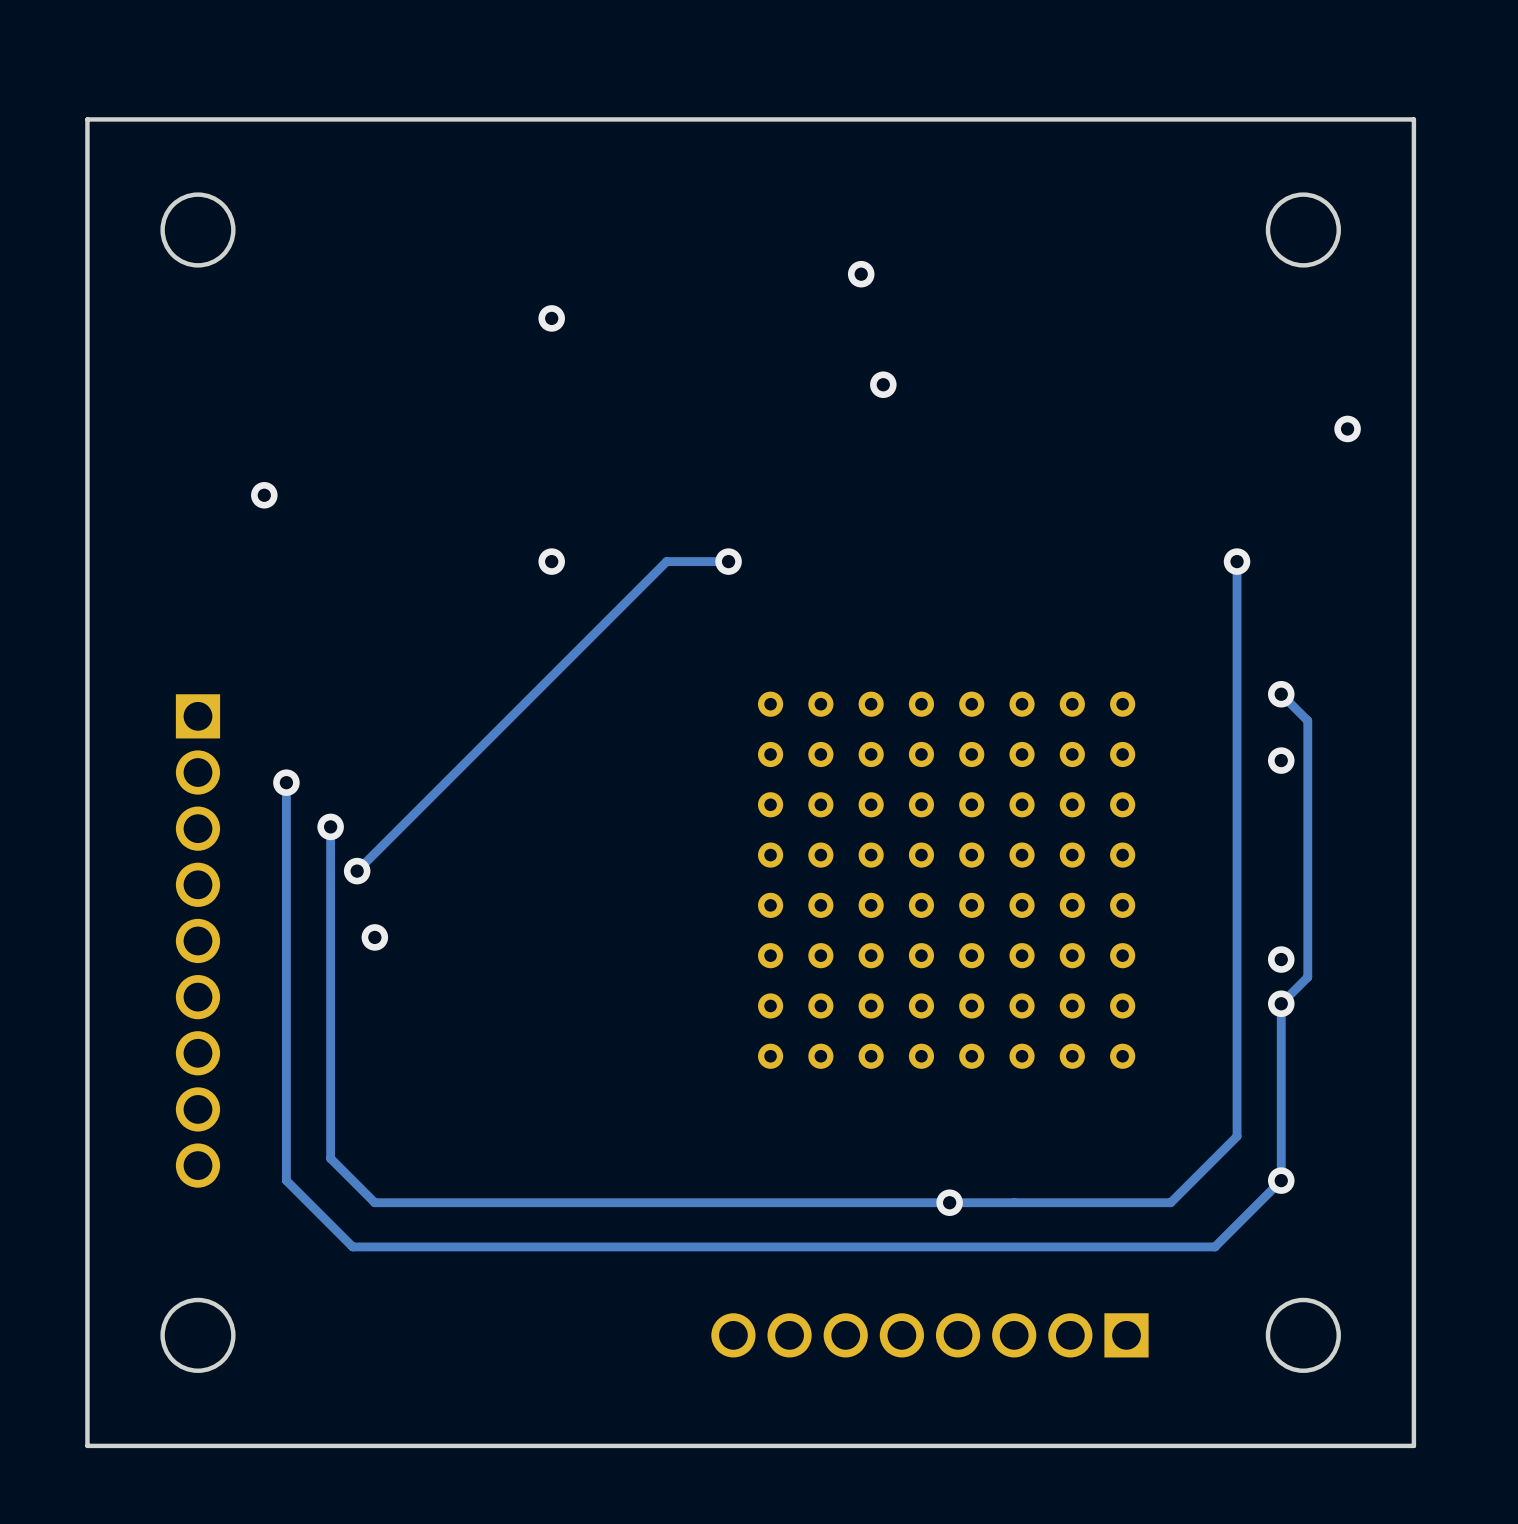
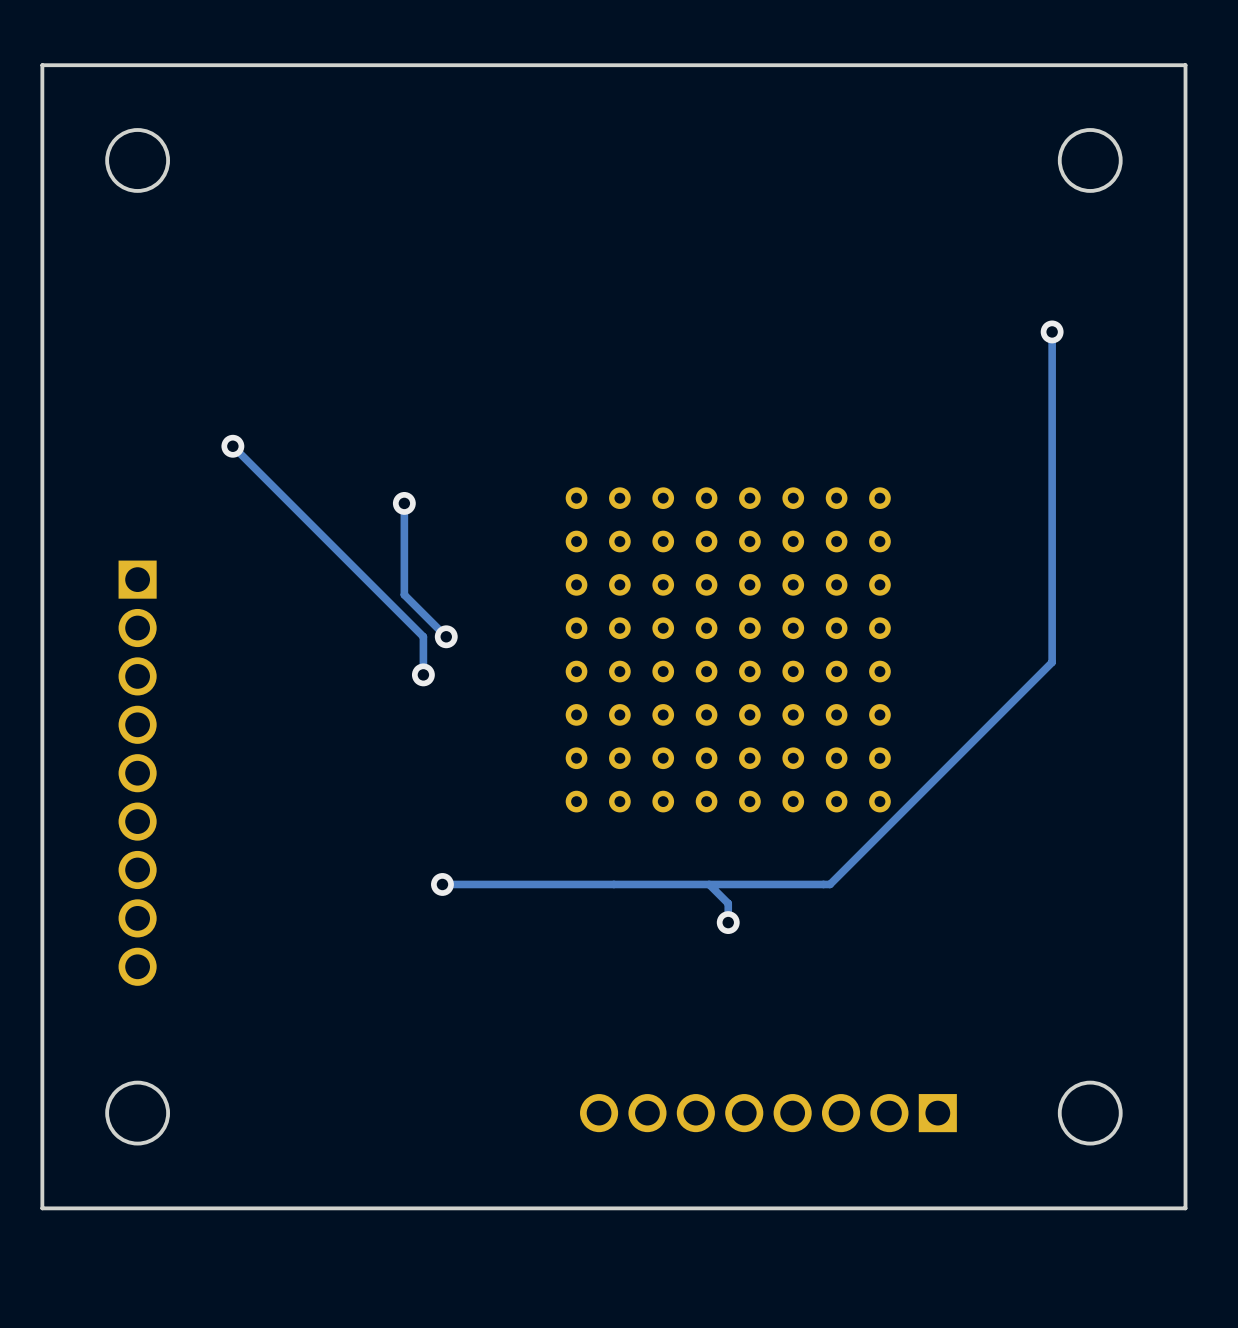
via: (861, 274) -> none
via: (551, 318) -> none
via: (883, 384) -> none
track: none -> (1052, 331) (1052, 662) (830, 884) (442, 884)
via: none -> (1052, 331)
via: (1347, 428) -> none
via position: (264, 495) -> (232, 446)
track: none -> (232, 446) (423, 636) (423, 674)
via position: (551, 561) -> (404, 503)
track: (728, 561) (666, 561) (357, 871) -> none
via: (728, 561) -> none
track: (1237, 561) (1237, 1136) (1170, 1202) (374, 1202) (330, 1158) (330, 826) -> none
via: (1237, 561) -> none
track: none -> (404, 503) (404, 594) (446, 636)
track: (1281, 694) (1307, 720) (1307, 977) (1281, 1003) (1281, 1180) (1214, 1246) (352, 1246) (286, 1180) (286, 782) -> none
via: (1281, 694) -> none
via: (1281, 760) -> none
via: (286, 782) -> none
via: none -> (446, 636)
via: (330, 826) -> none
via: none -> (423, 674)
via: (357, 871) -> none
part position: (946, 880) -> (728, 649)
via: (374, 937) -> none
via: (1281, 959) -> none
via: (1281, 1003) -> none
via: none -> (442, 884)
track: none -> (709, 884) (728, 903) (728, 922)
via: (1281, 1180) -> none
via position: (949, 1202) -> (728, 922)

